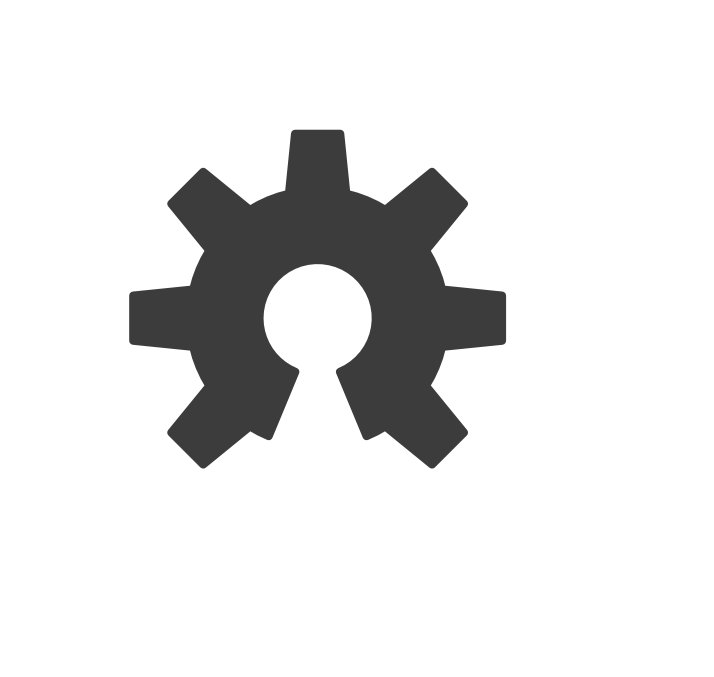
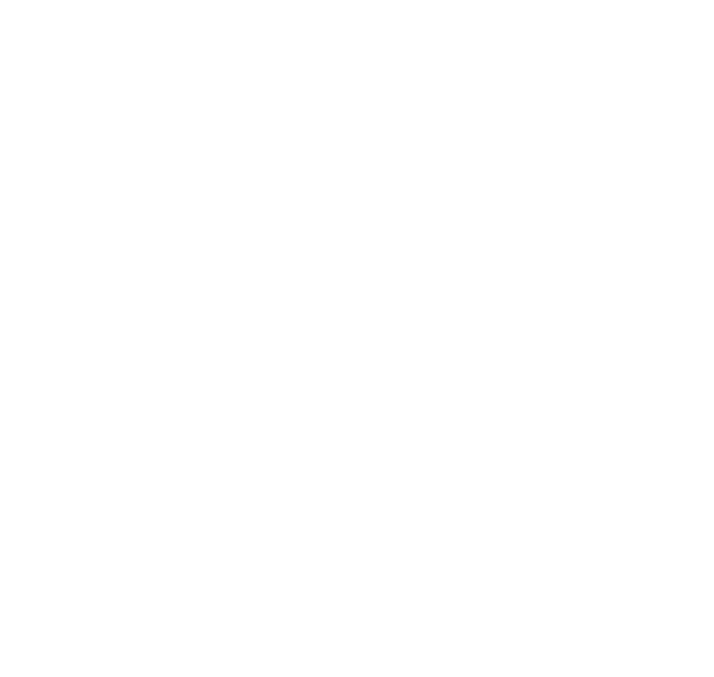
drawing: [129, 129, 507, 469] -> none

